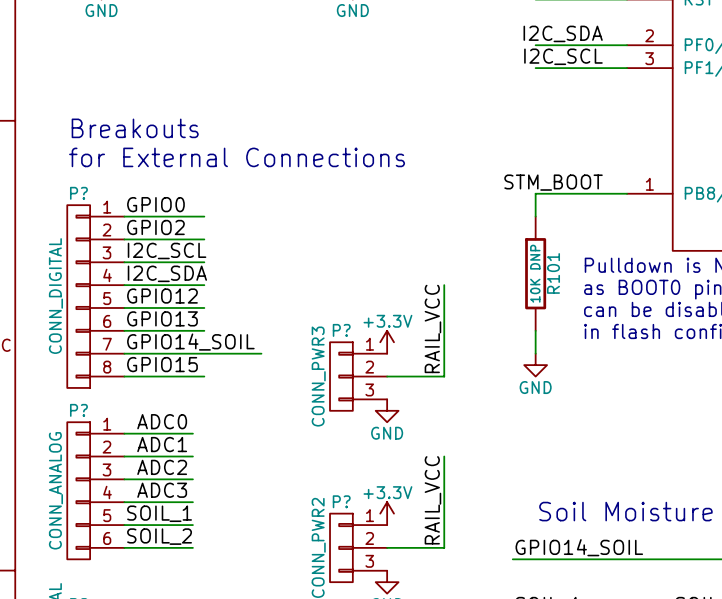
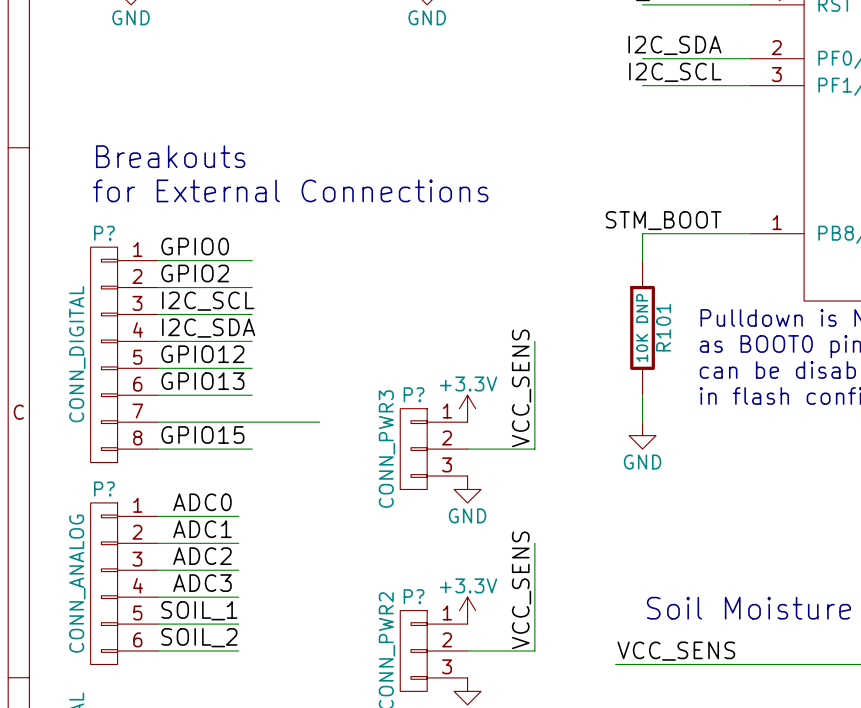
label: RAIL_VCC (432, 328) -> VCC_SENS (521, 388)
label: GPIO14_SOIL (190, 342) -> none
label: RAIL_VCC (432, 500) -> VCC_SENS (521, 590)
label: GPIO14_SOIL (579, 547) -> VCC_SENS (676, 651)

